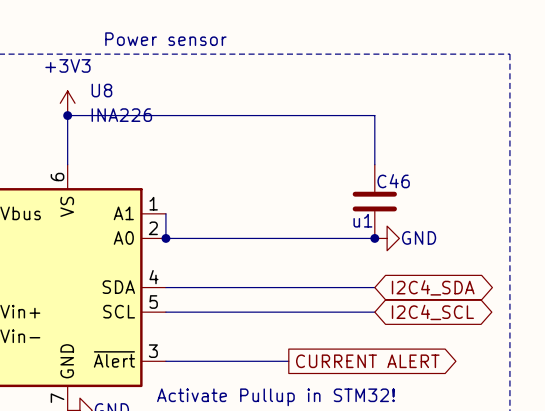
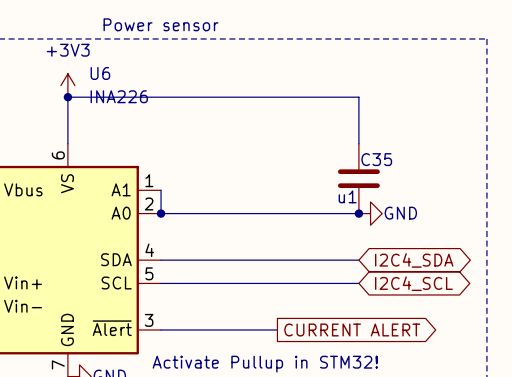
U8 name: U8 (101, 90) -> U6 (100, 73)
C46 name: C46 (393, 181) -> C35 (376, 159)

